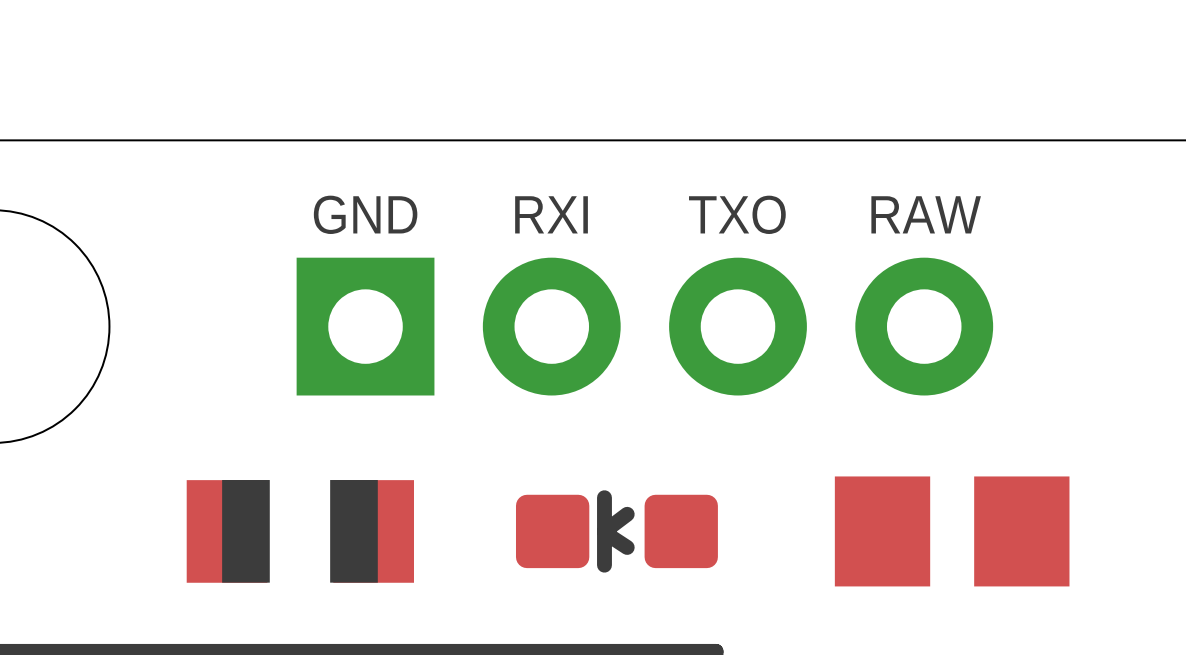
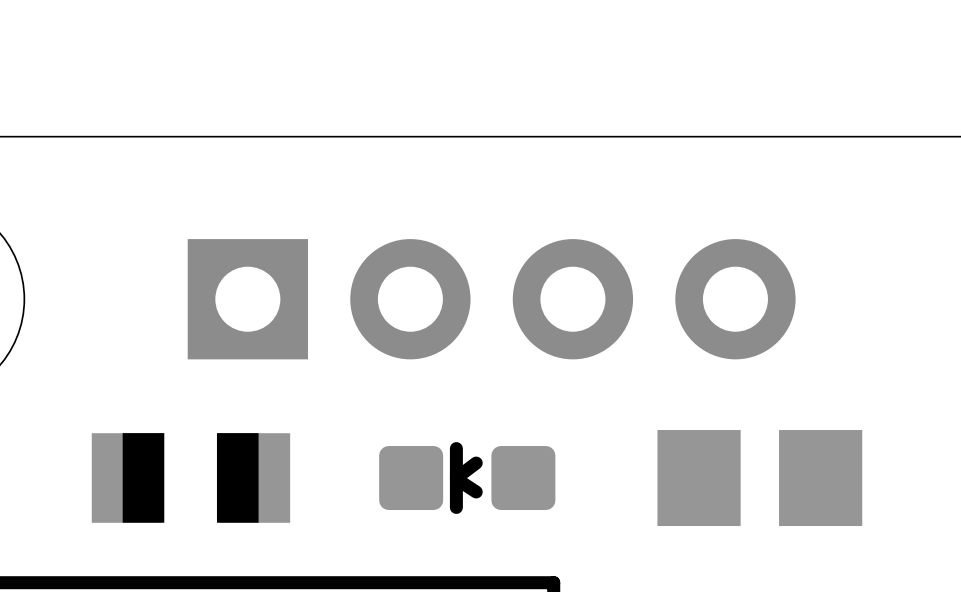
text: GND (365, 214) -> none
text: RXI (551, 214) -> none
text: TXO (737, 214) -> none
text: RAW (926, 214) -> none

